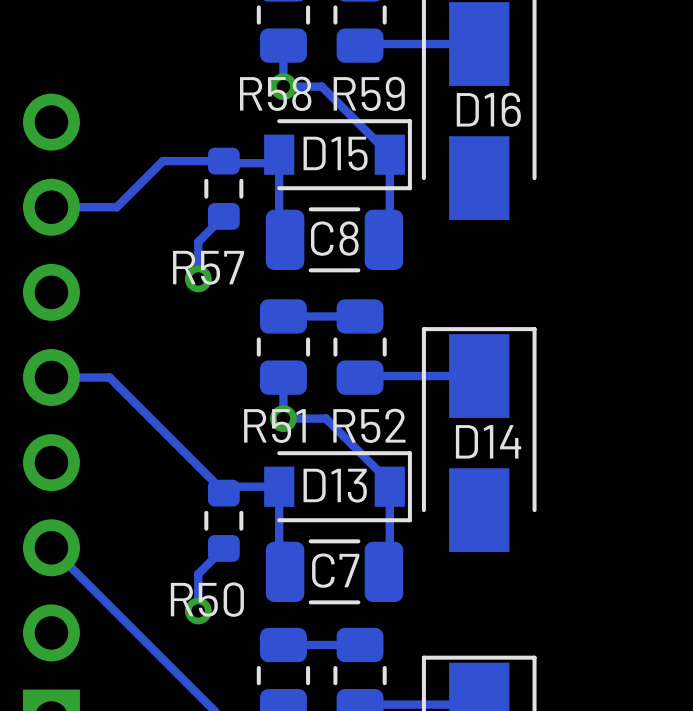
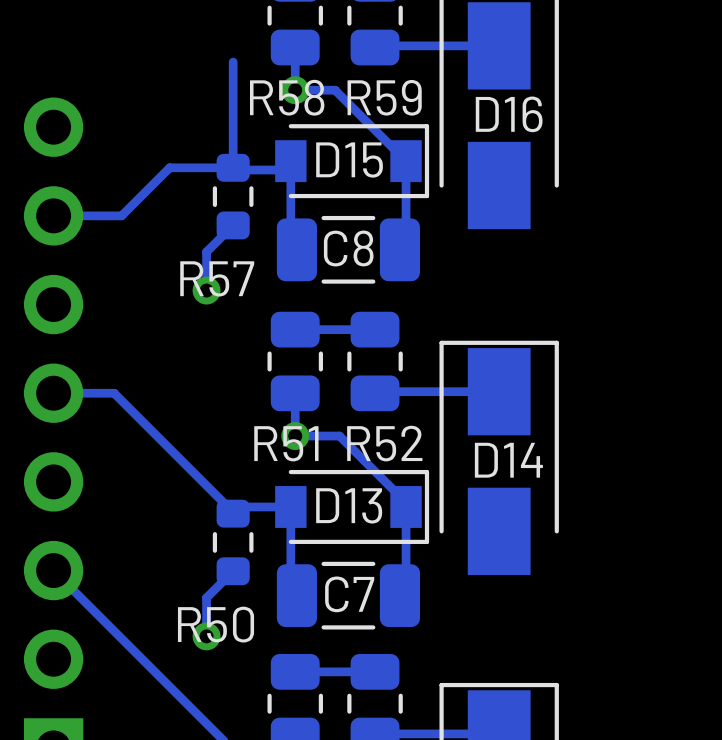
track: none -> (233, 62) (233, 167)

